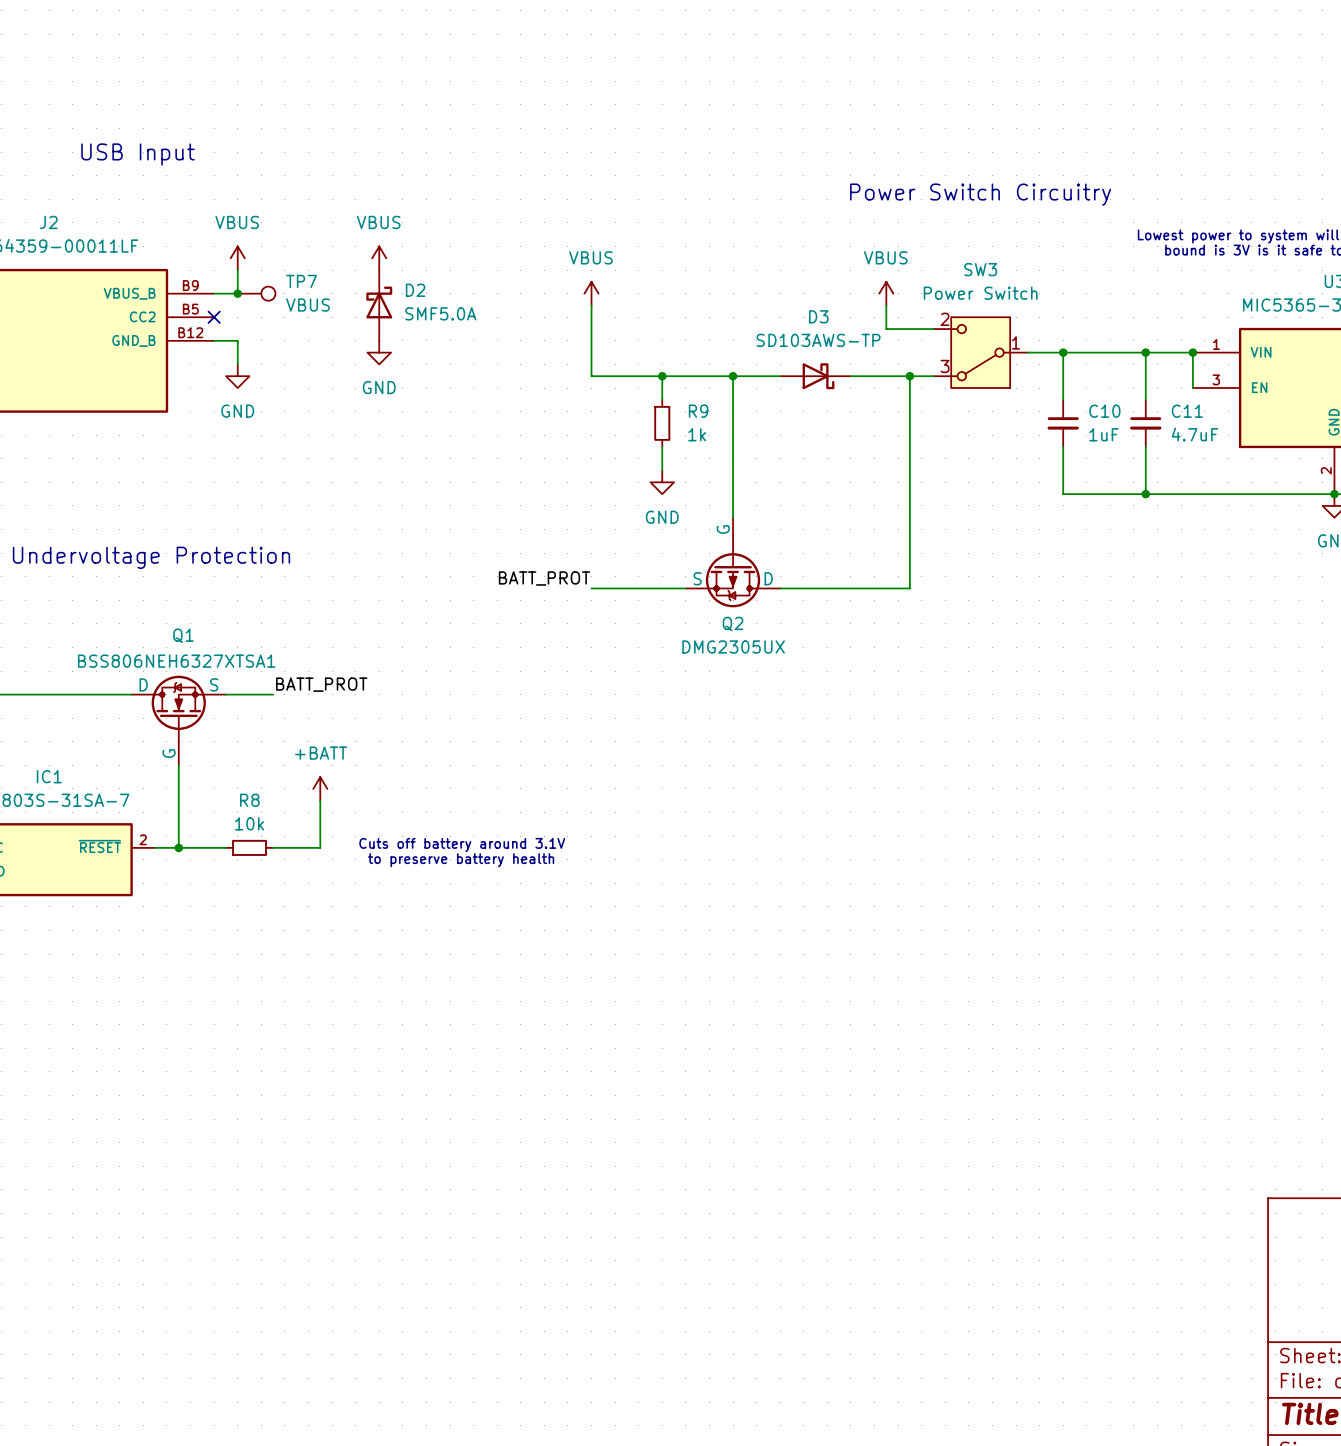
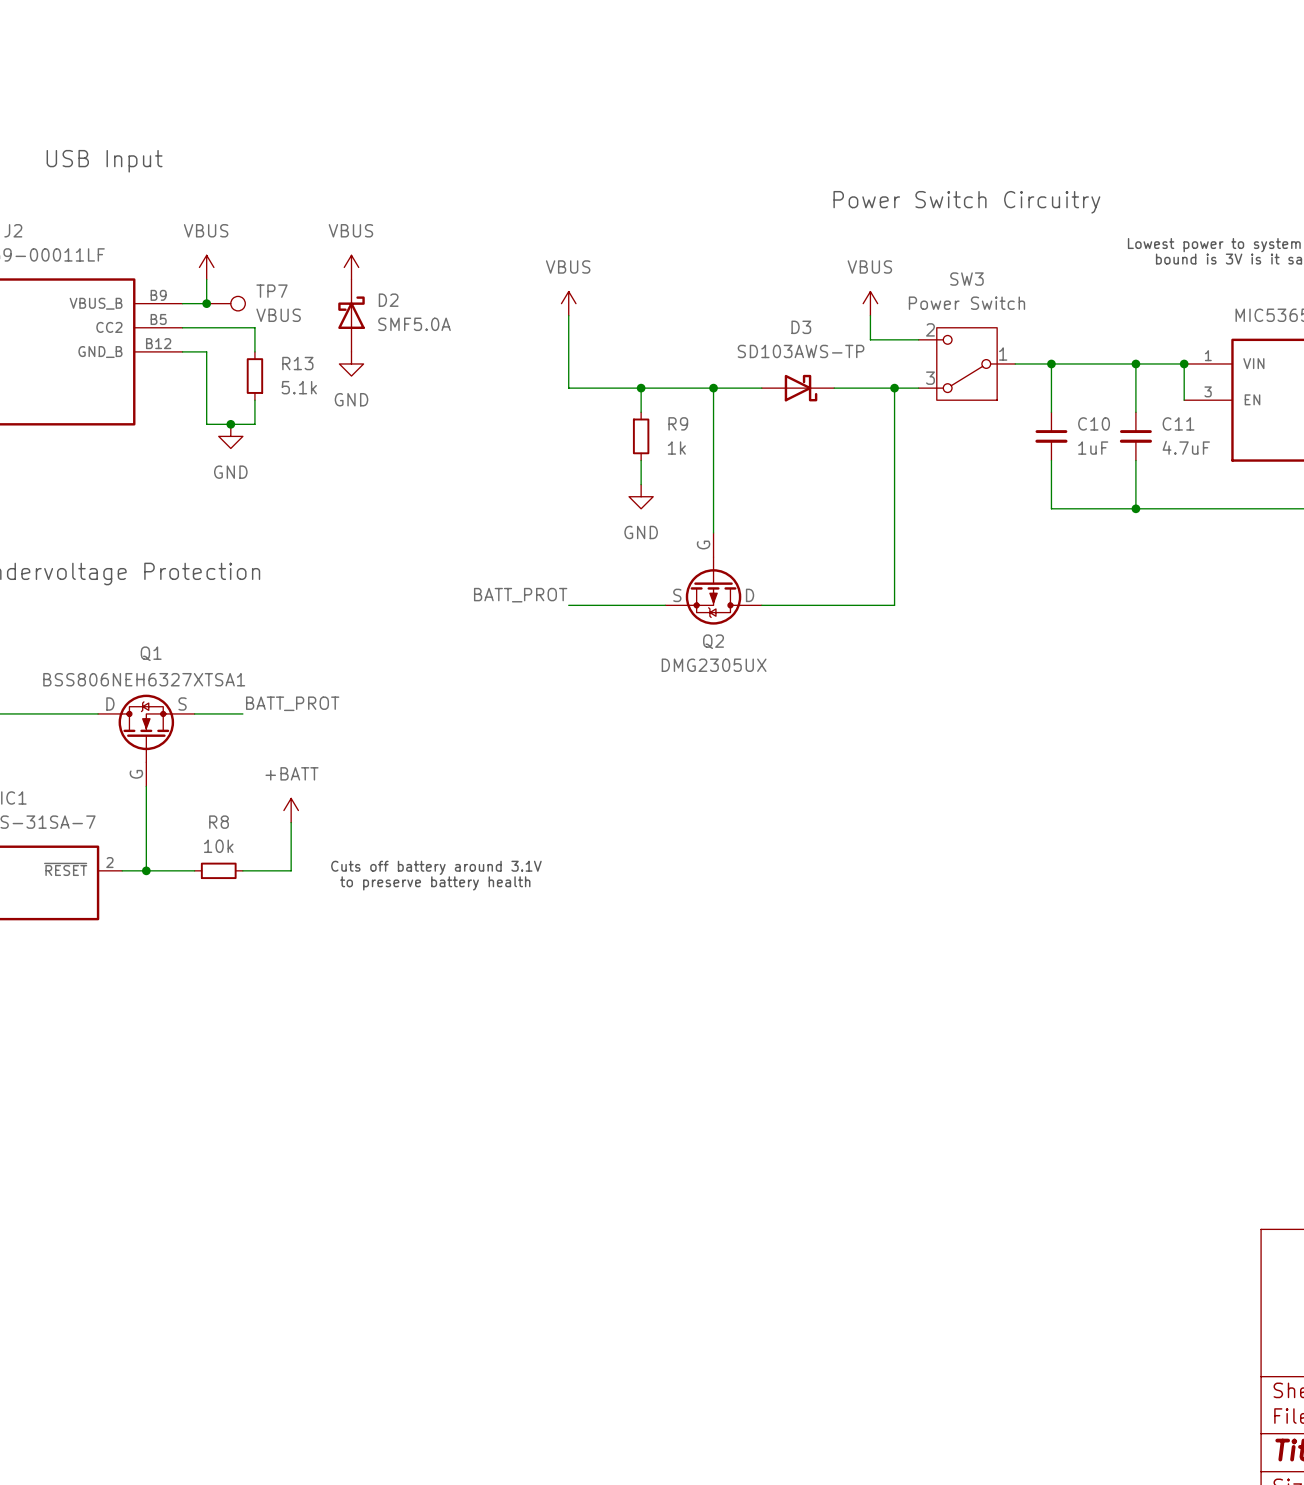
wire: none -> (182, 327) (254, 327) (254, 351)
no-connect mark: (214, 317) -> none
wire: none -> (206, 376) (206, 424) (254, 424) (254, 400)
R13: none -> 5.1k (254, 376)
power symbol position: GND (237, 376) -> GND (230, 436)
junction: none -> (230, 424)

